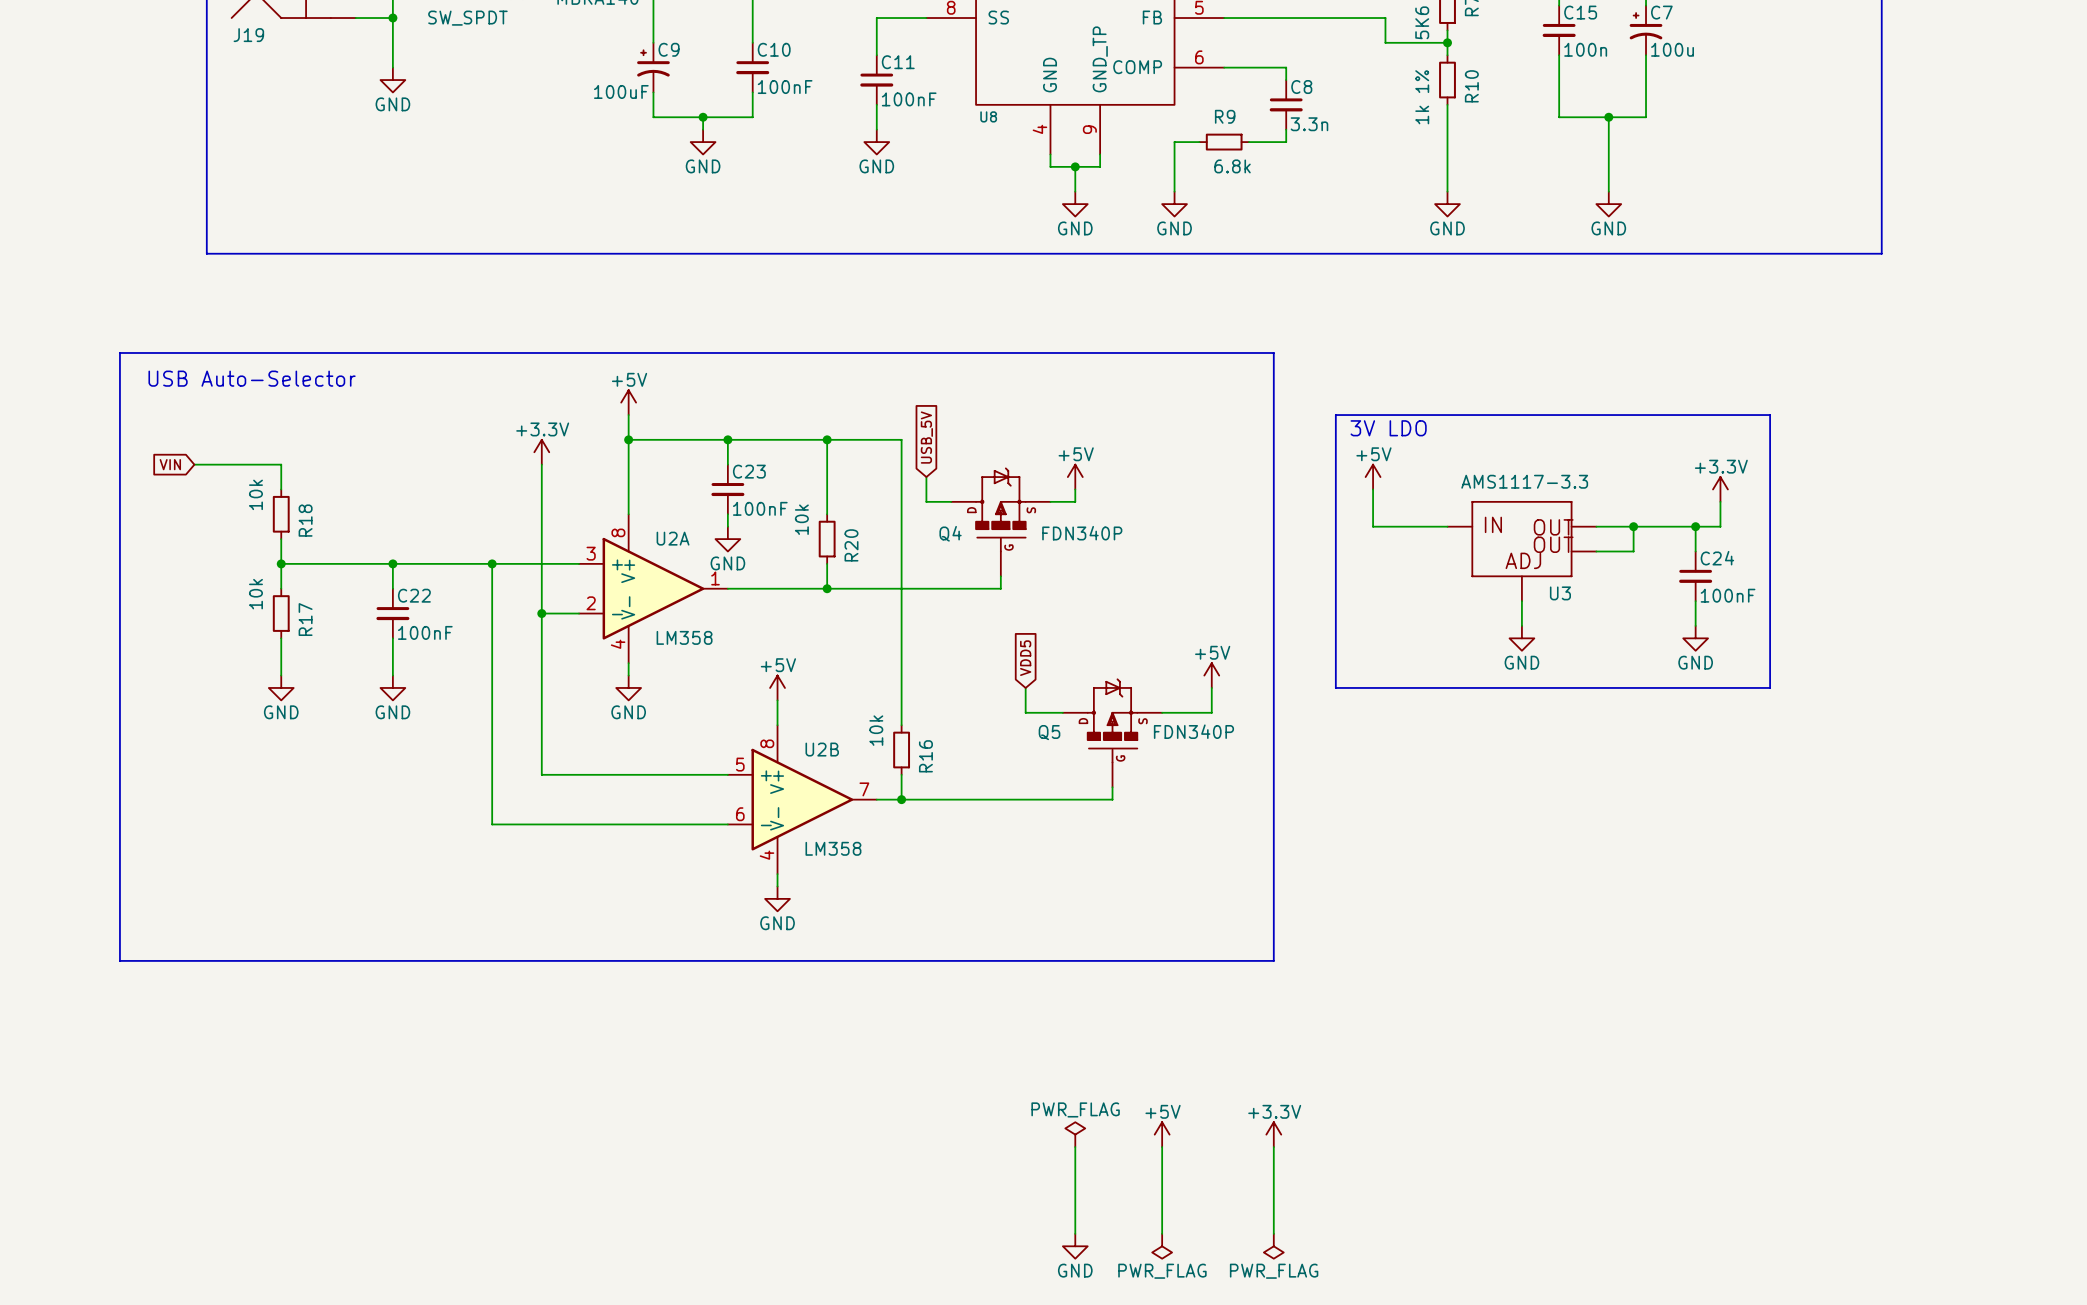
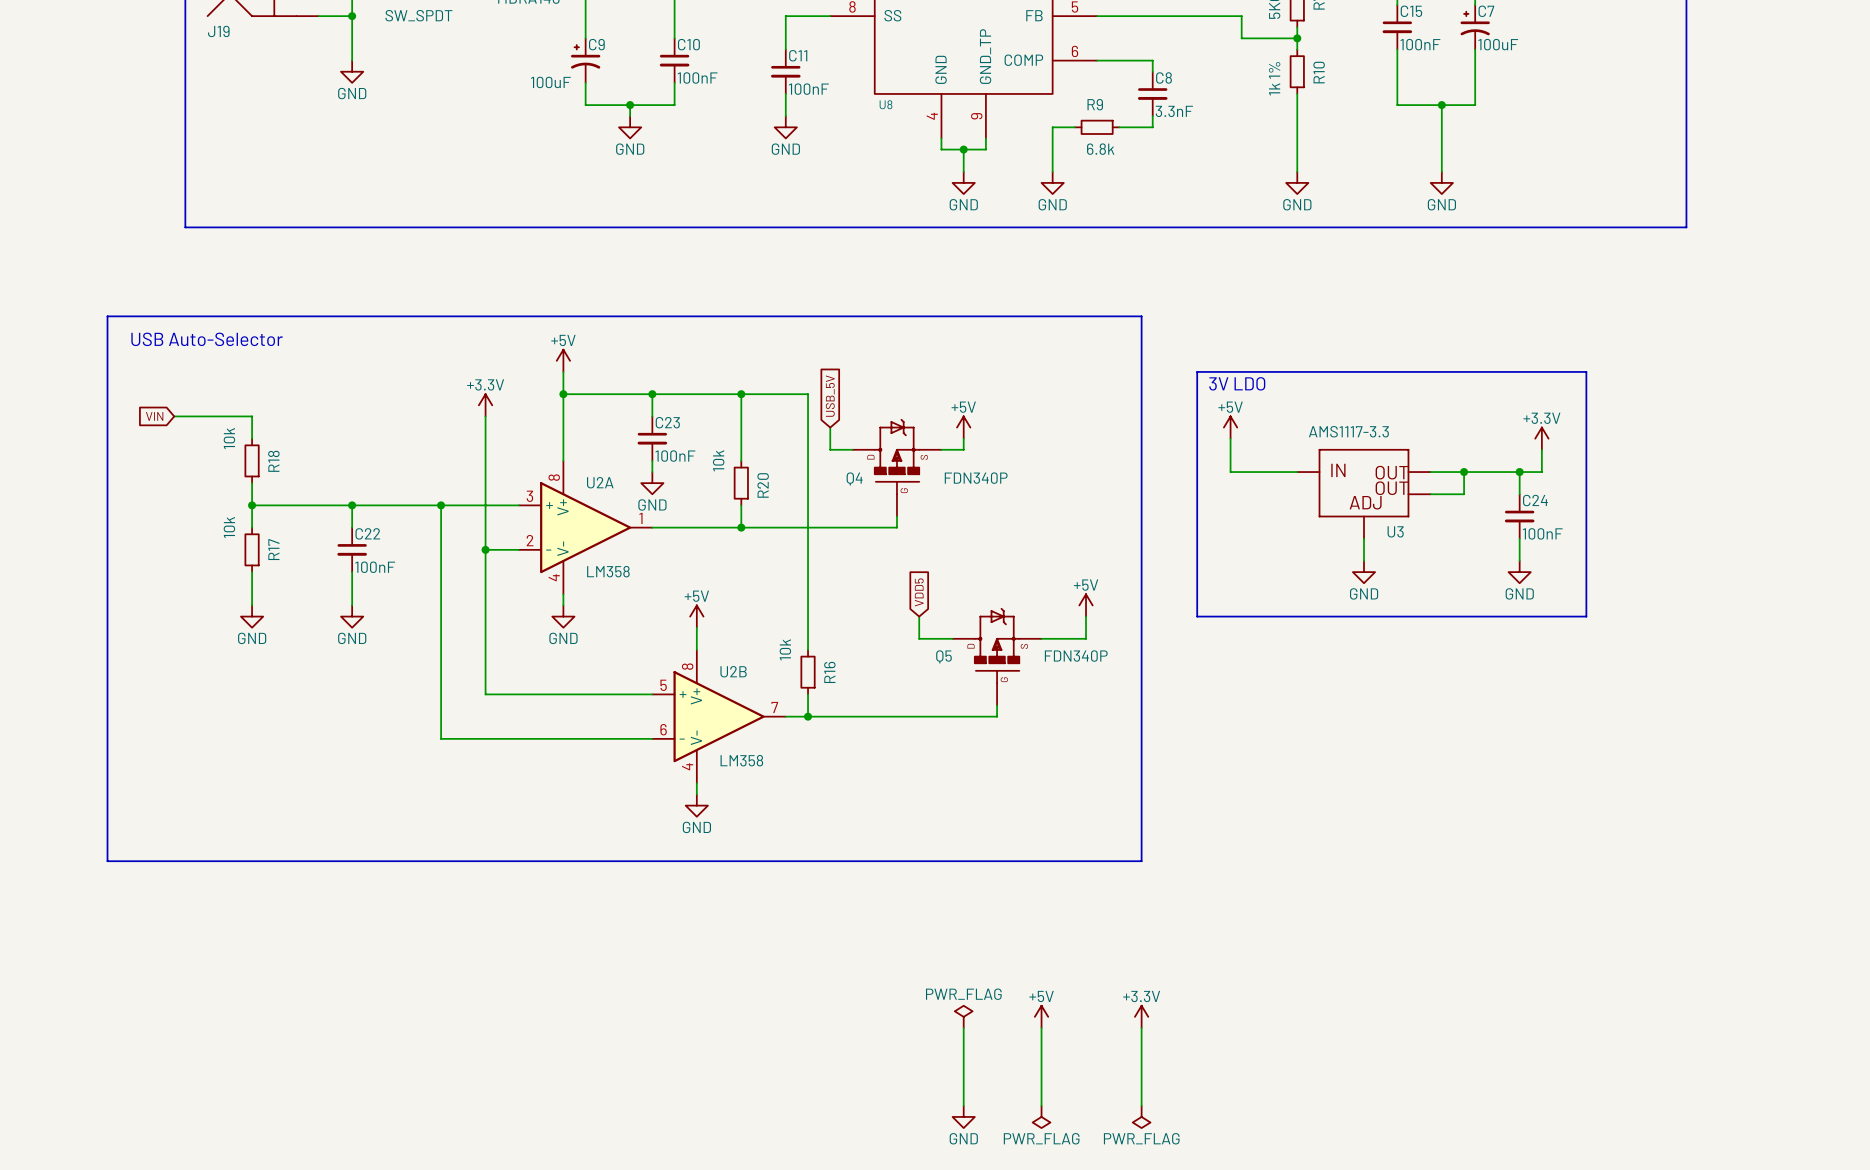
C15 value: 100n (1585, 49) -> 100nF (1420, 44)
C7 value: 100u (1672, 49) -> 100uF (1498, 44)
C8 value: 3.3n (1309, 124) -> 3.3nF (1174, 111)

